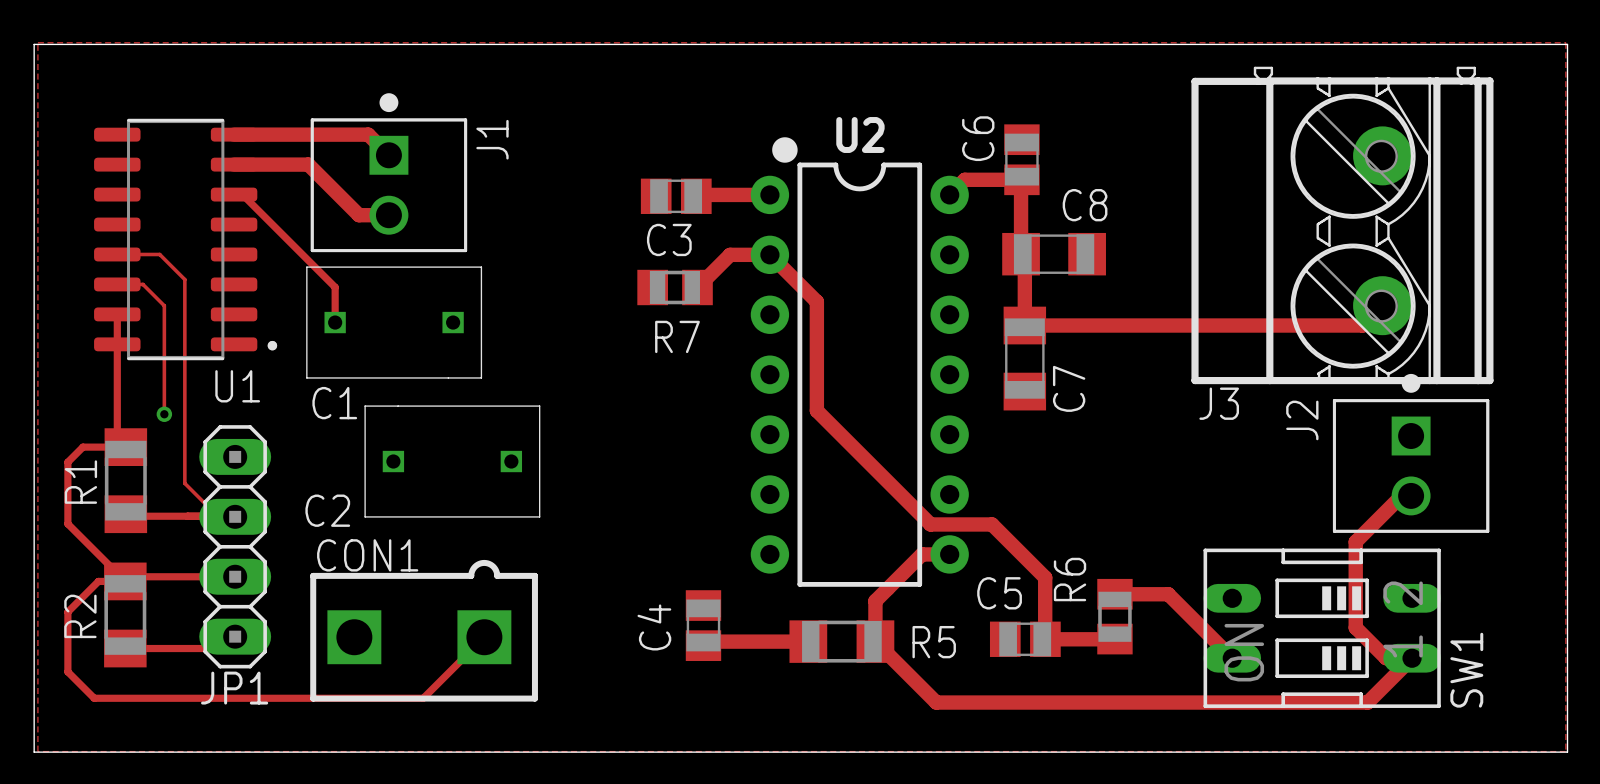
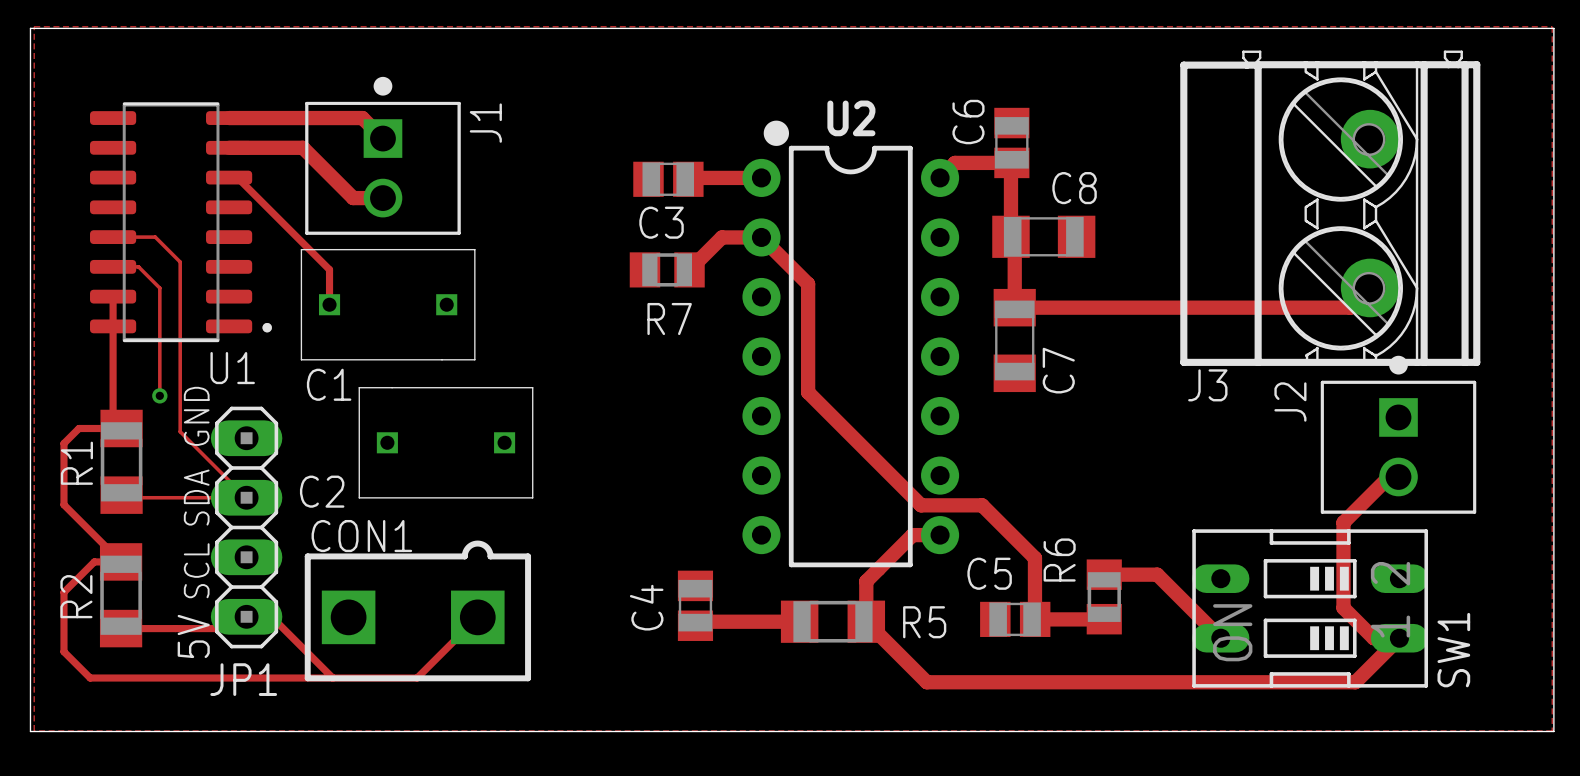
text: none -> GND (196, 416)
track: (184, 450) (184, 483) (217, 516) -> (180, 431) (246, 497)
track: (127, 516) (235, 516) -> (123, 497) (246, 497)
text: none -> SDA (196, 497)
JP1 position: (235, 546) -> (246, 527)
track: (131, 576) (235, 576) -> none
text: none -> SCL (196, 570)
track: none -> (246, 616) (271, 616) (332, 678)
text: none -> 5V (193, 636)
JP1 name position: JP1 (234, 688) -> JP1 (243, 679)

